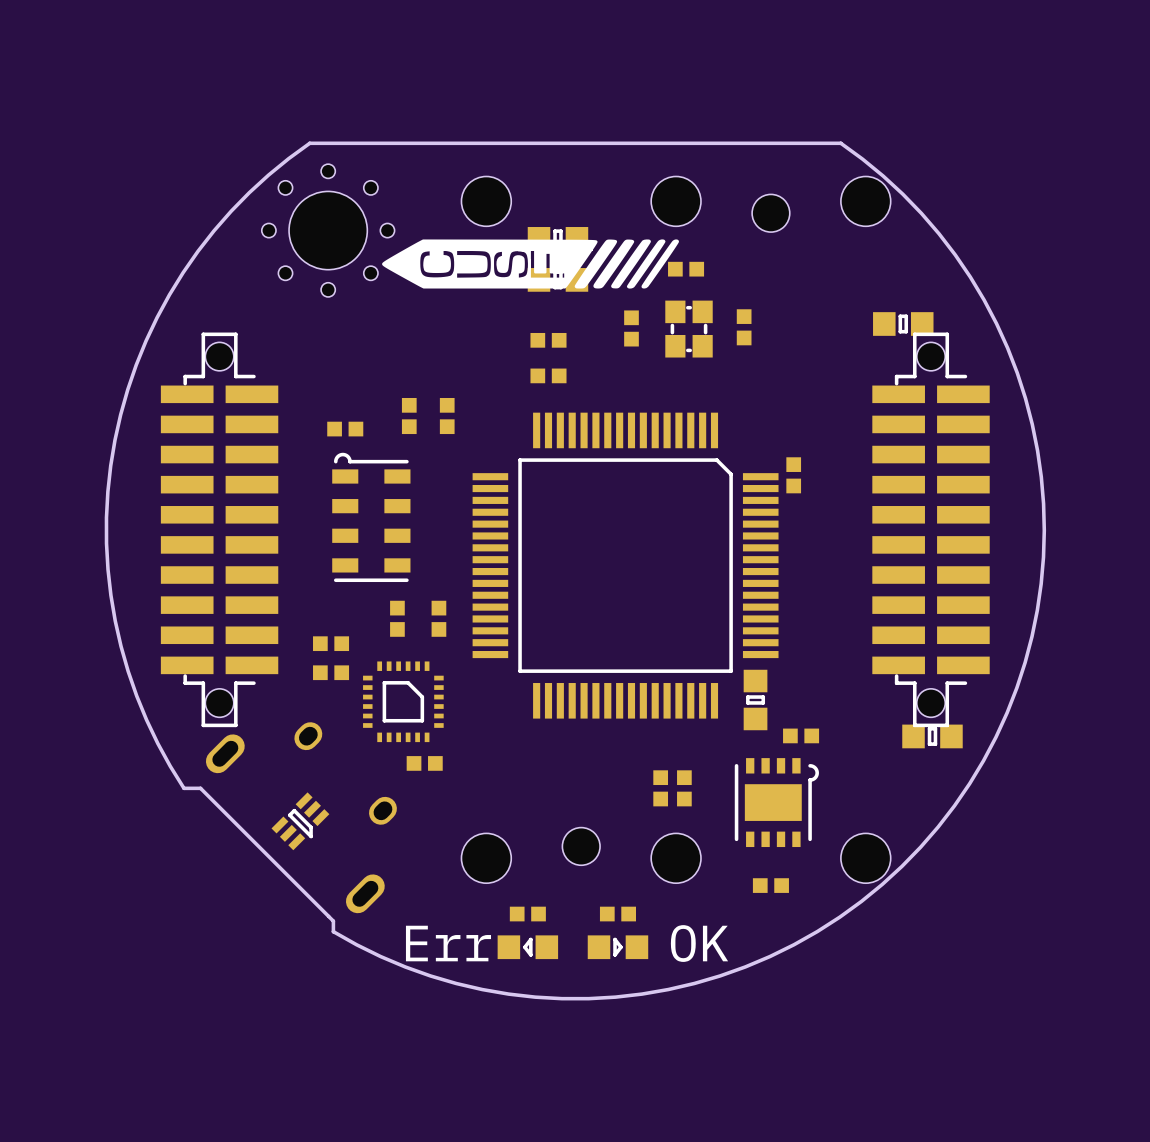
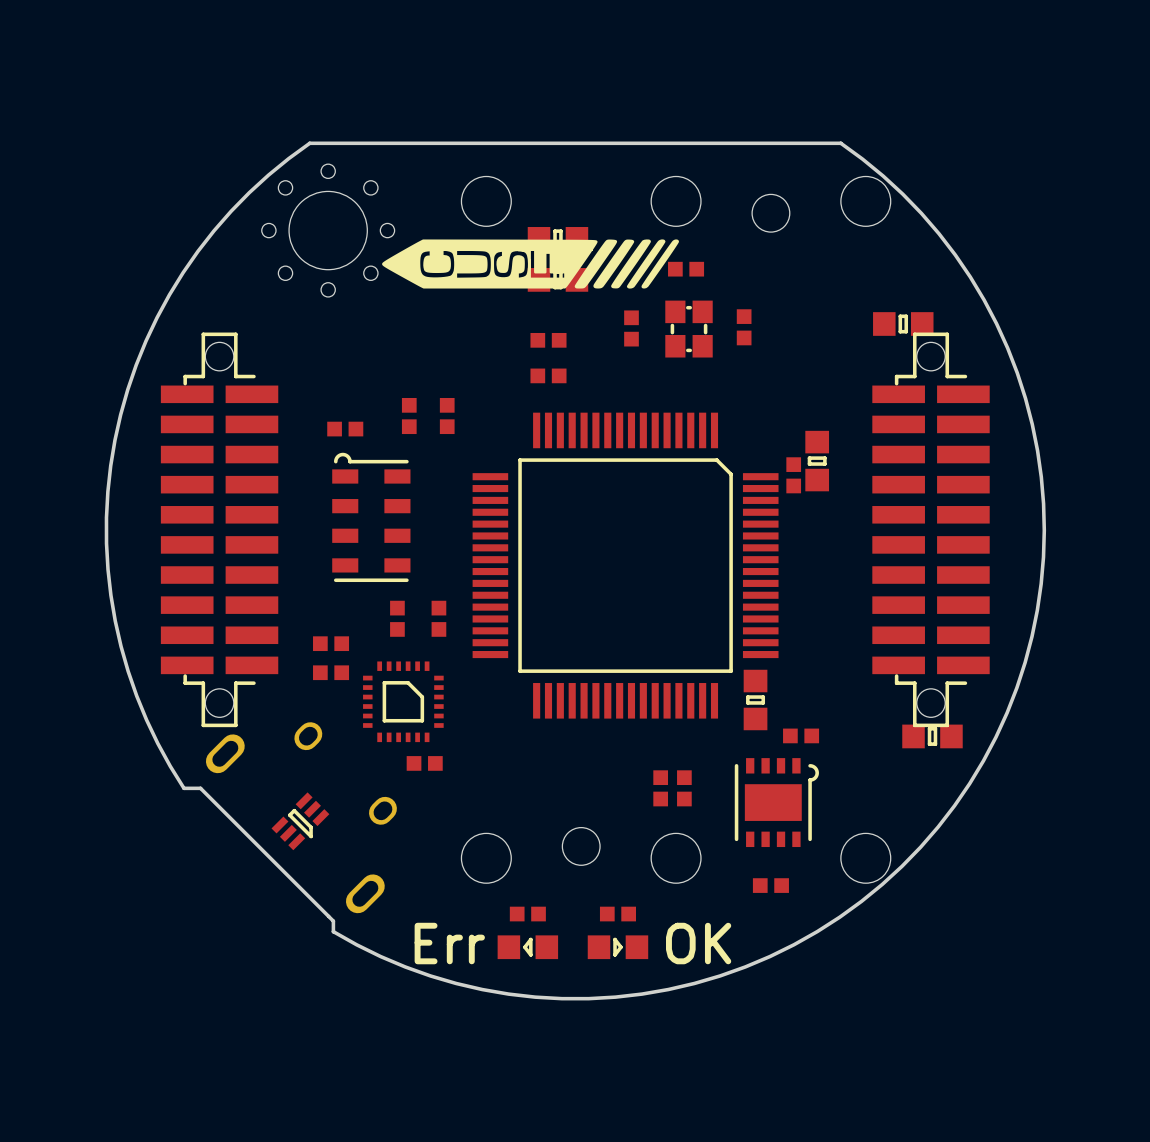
part: none -> (817, 461)

